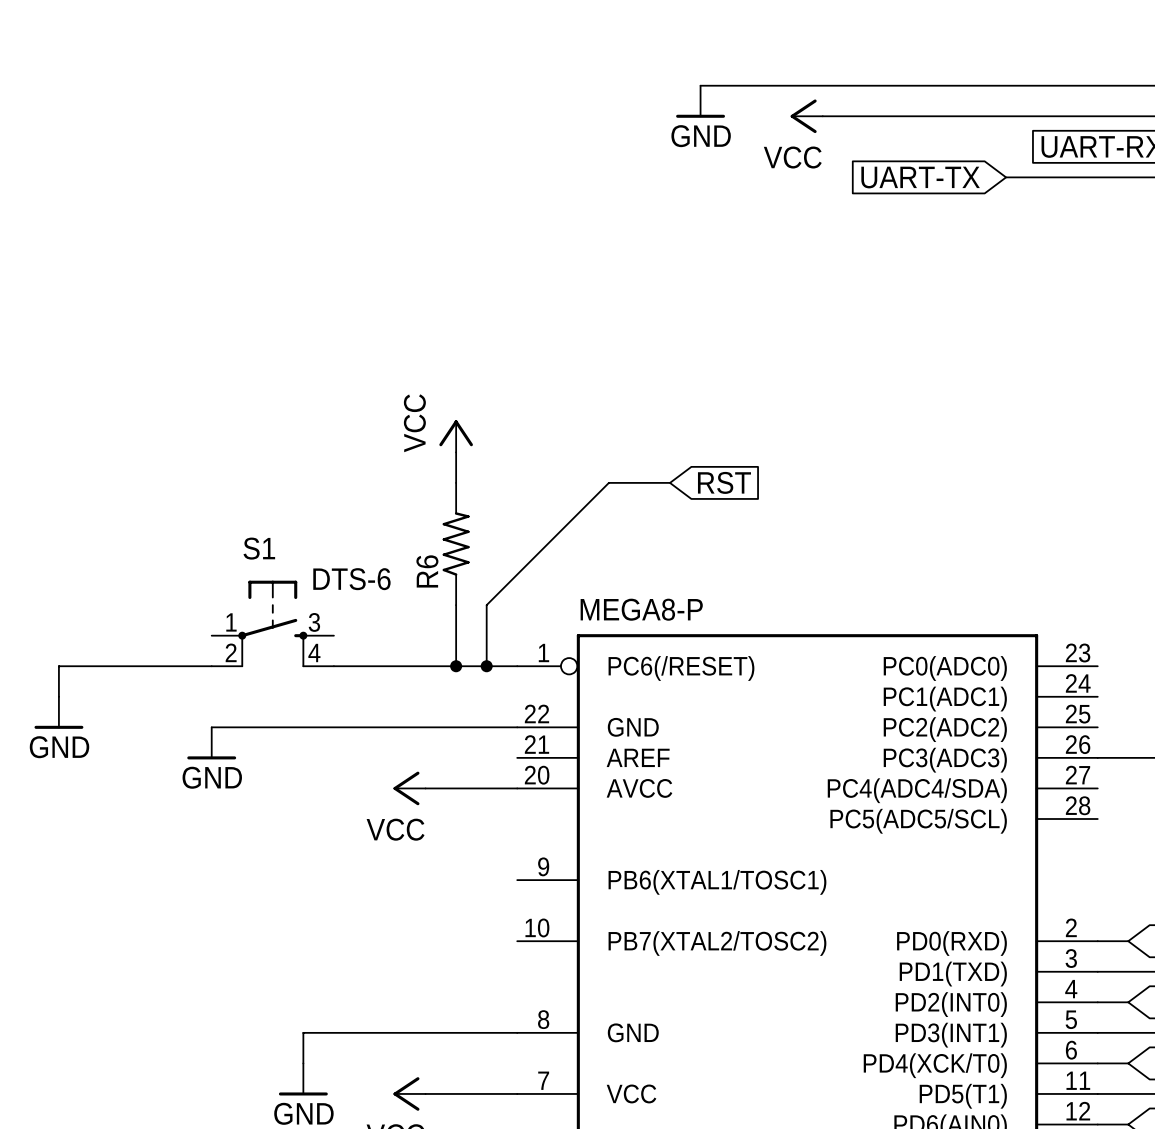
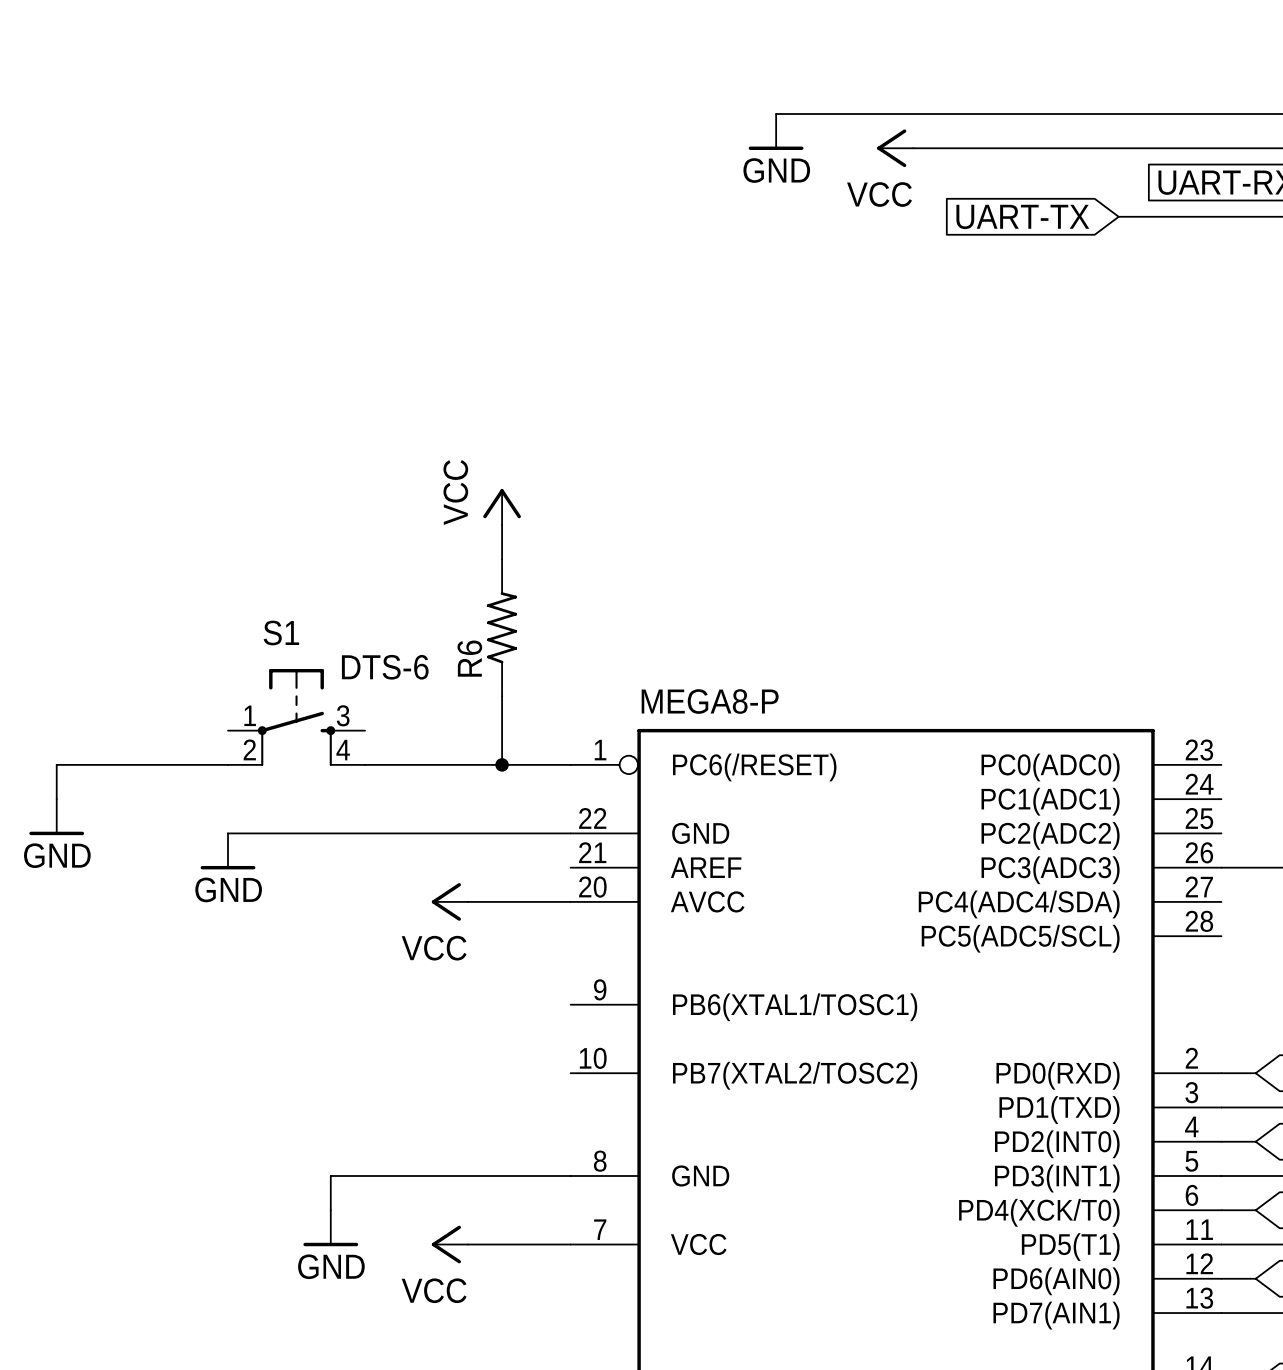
wire: (670, 482) (608, 482) (486, 605) (486, 666) -> none
global label: RST (724, 482) -> none
junction: (486, 666) -> none

